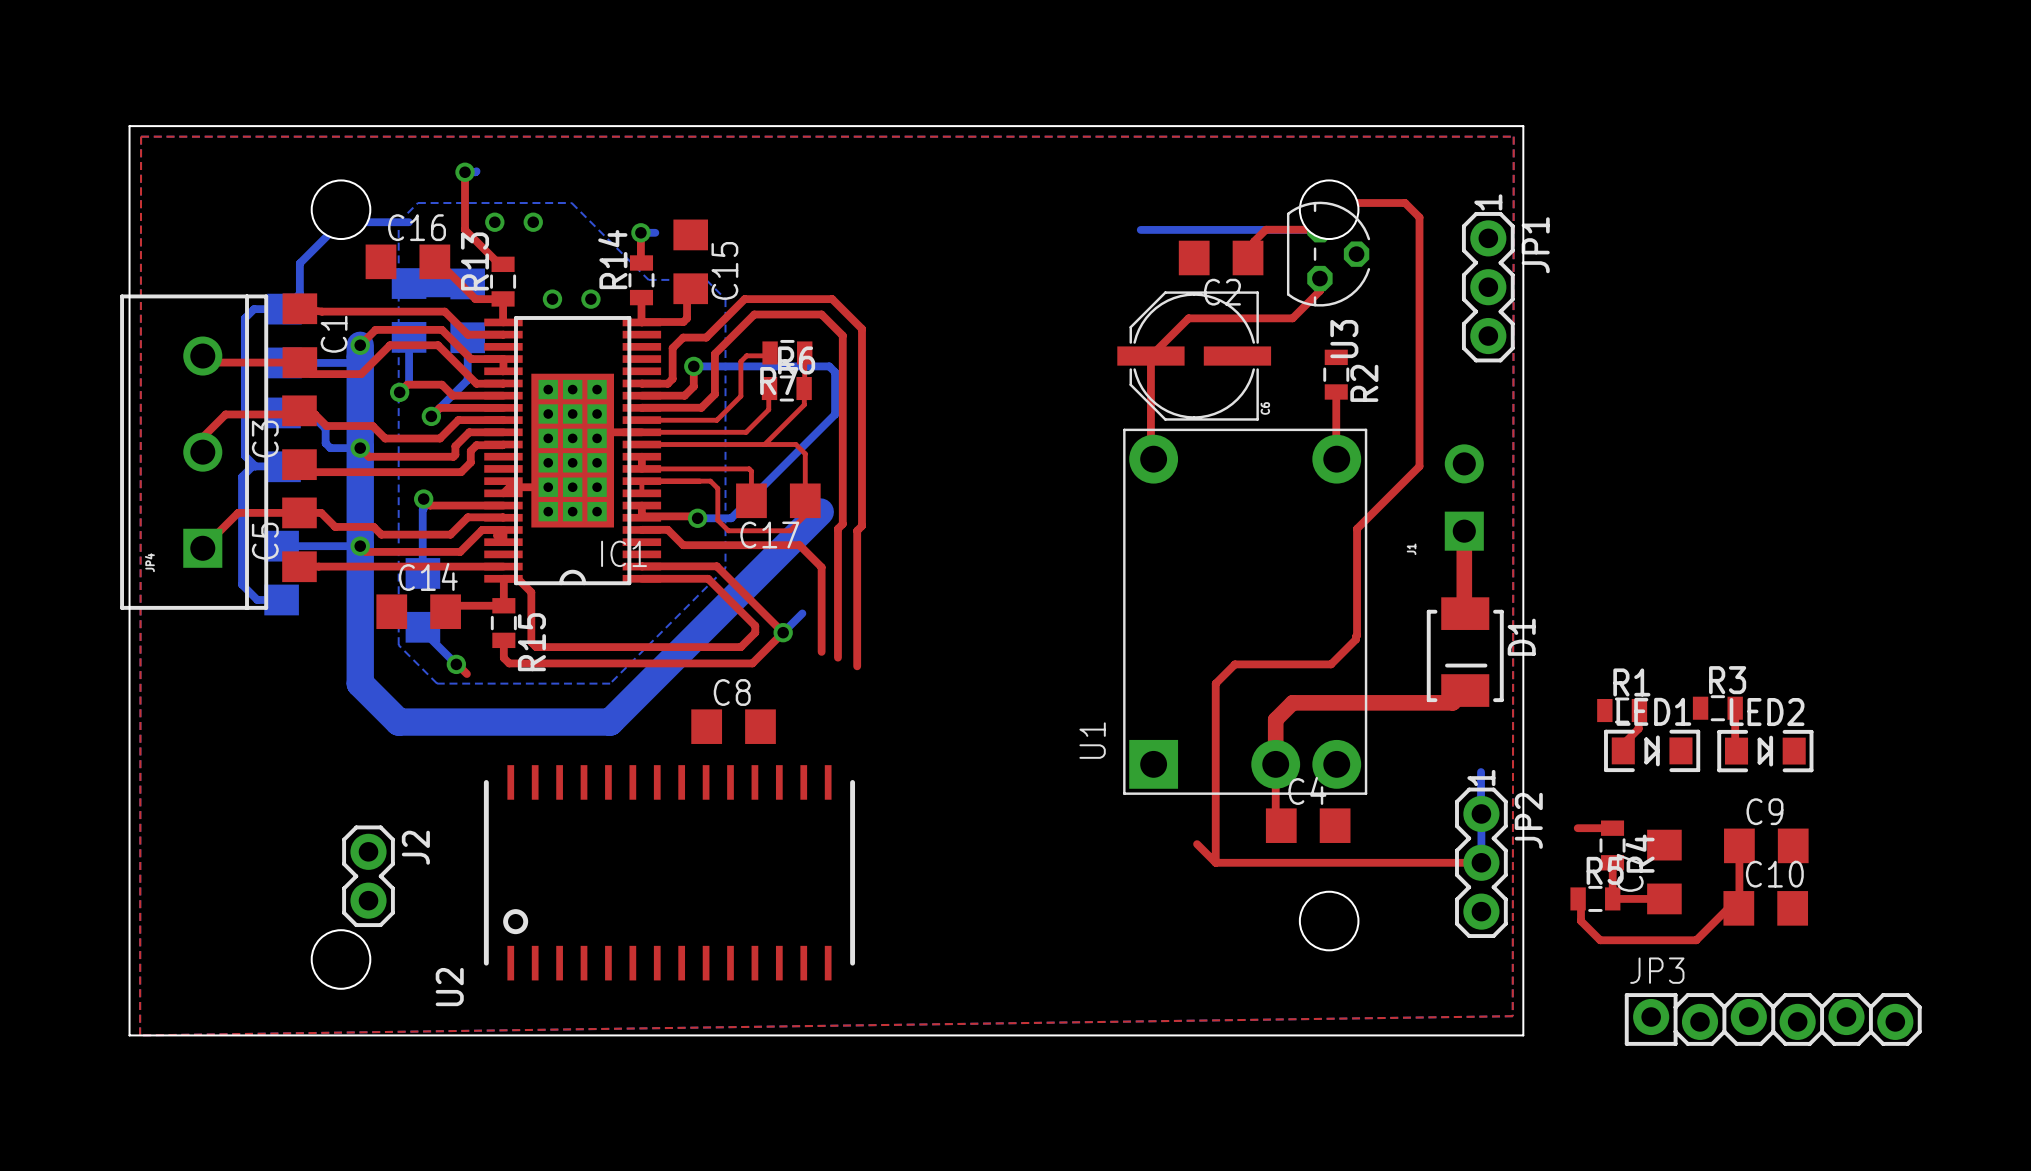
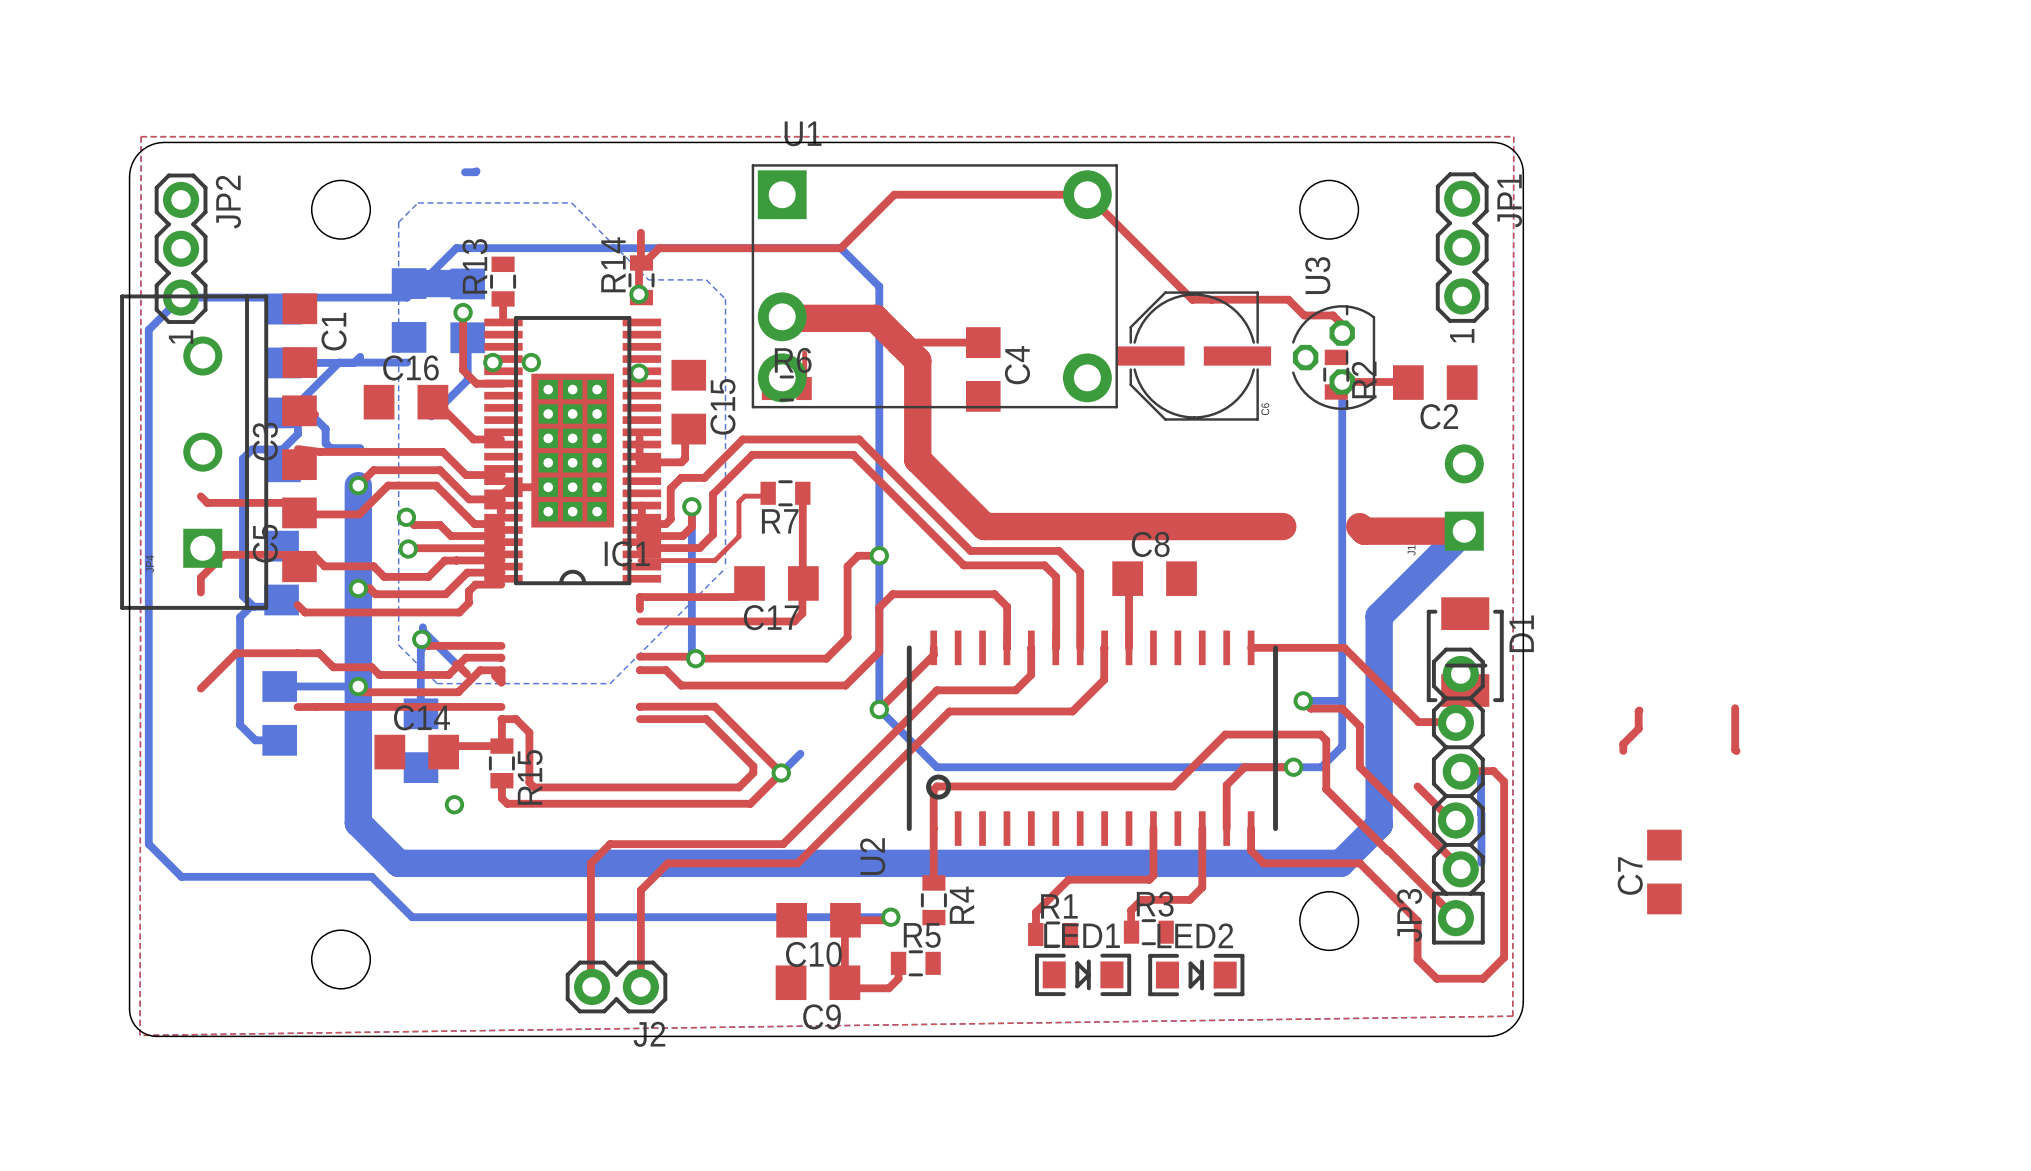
top track: (465, 172) (465, 229) (498, 262) (504, 262) (503, 264) -> none
via: (465, 172) -> none
board edge: (1523, 172) (1523, 126) (129, 126) (129, 177) -> (1523, 172) (1521, 161) (1514, 151) (1504, 144) (1492, 142) (164, 142) (150, 145) (139, 152) (132, 163) (129, 177)
JP1 text position: 1 (1488, 202) -> 1 (1462, 335)
bottom track: (409, 222) (341, 222) (299, 263) (299, 293) (284, 309) (254, 309) (244, 318) (244, 455) (255, 466) -> (407, 362) (339, 362) (297, 403) (297, 434) (282, 449) (252, 449) (242, 458) (242, 596) (253, 606)
via: (494, 222) -> none
via: (533, 222) -> none
bottom track: (1140, 229) (1319, 229) -> none
bottom track: (640, 232) (655, 232) -> none
via: (640, 232) -> none
U3 rotation: 0° (1328, 254) -> 180° (1333, 357)
U3 position: (1328, 254) -> (1333, 357)
C2 position: (1221, 257) -> (1435, 382)
top track: (1248, 257) (1254, 251) (1254, 241) (1265, 229) (1319, 229) (1319, 208) (1325, 203) (1405, 203) (1419, 217) (1419, 466) (1357, 528) (1356, 639) (1331, 664) (1234, 664) (1215, 683) (1215, 862) -> none
C16 position: (407, 261) -> (405, 402)
top track: (434, 261) (438, 261) (475, 299) (502, 299) -> (432, 402) (436, 402) (473, 439) (500, 439)
C15 position: (690, 261) -> (688, 402)
top track: (1319, 278) (1319, 291) (1292, 318) (1188, 318) (1150, 356) (1150, 456) (1153, 459) -> none
JP1 position: (1488, 287) -> (1462, 247)
top track: (690, 288) (687, 292) (687, 318) (683, 322) (641, 322) (641, 297) -> (688, 429) (685, 432) (685, 458) (681, 462) (639, 462) (639, 437)
top track: none -> (638, 294) (638, 268) (659, 248) (840, 248) (894, 194) (1087, 194) (1192, 299) (1288, 299) (1304, 315) (1333, 315) (1342, 325) (1342, 332)
via: none -> (638, 294)
via: (552, 299) -> none
via: (590, 299) -> none
top track: (299, 308) (321, 311) (444, 311) (467, 334) (503, 334) -> (297, 449) (320, 451) (442, 451) (465, 475) (501, 475)
via: none -> (463, 312)
top track: none -> (782, 316) (783, 318) (875, 318) (917, 360) (917, 459) (984, 526) (1282, 526)
bottom track: (409, 337) (409, 382) (399, 392) -> none
top track: none -> (983, 342) (899, 342)
top track: (360, 345) (375, 329) (441, 329) (471, 359) (503, 359) (502, 371) -> (358, 485) (373, 470) (440, 470) (469, 499) (501, 499) (500, 511)
bottom track: (360, 345) (360, 683) (398, 722) (610, 722) (820, 511) -> none
via: (360, 345) -> none
top track: (770, 352) (767, 355) (746, 355) (740, 361) (740, 396) (716, 420) (642, 420) -> (768, 493) (765, 496) (744, 496) (738, 501) (738, 536) (714, 560) (640, 560)
R7 position: (787, 352) -> (785, 493)
top track: (202, 356) (209, 362) (299, 362) (311, 374) (361, 374) (390, 345) (438, 345) (463, 370) -> (463, 312) (463, 370)
via: none -> (492, 362)
via: none -> (531, 362)
top track: (693, 366) (693, 386) (684, 395) (641, 395) -> (691, 506) (691, 526) (682, 536) (639, 536)
bottom track: (693, 366) (829, 366) (835, 372) (835, 414) (731, 518) (697, 518) -> none
via: (693, 366) -> none
via: none -> (638, 373)
top track: none -> (1342, 381) (1408, 382)
bottom track: none -> (1342, 381) (1342, 746) (1321, 767) (936, 767) (879, 709) (879, 286) (840, 248) (456, 248) (406, 297) (181, 297) (148, 329) (148, 844) (181, 876) (371, 876) (412, 917) (890, 917)
top track: (642, 383) (667, 383) (672, 378) (672, 348) (683, 337) (706, 337) (744, 299) (832, 299) (862, 328) (862, 525) (857, 530) (857, 666) -> none
top track: (769, 388) (768, 409) (746, 432) (590, 433) (597, 438) -> none
top track: (804, 388) (804, 404) (764, 444) -> none
top track: (1336, 391) (1336, 459) -> none
top track: (399, 392) (407, 384) (441, 384) (452, 395) (503, 395) -> none
via: (399, 392) -> none
top track: (503, 407) (439, 407) (431, 416) -> none
top track: (642, 407) (701, 407) (714, 394) (714, 353) (754, 314) (821, 314) (842, 335) (842, 524) (837, 528) (837, 657) -> none
via: (431, 416) -> none
top track: (503, 420) (458, 420) (440, 438) (385, 438) (372, 426) (326, 426) (315, 414) (225, 414) (202, 437) (202, 452) -> none
top track: (503, 432) (469, 432) (455, 446) (455, 454) (453, 456) (368, 456) (360, 448) -> none
top track: (503, 444) (476, 445) (470, 451) (470, 462) (461, 472) (306, 472) (299, 464) -> none
top track: (641, 444) (795, 444) (805, 453) (805, 515) (789, 530) (728, 530) (717, 520) (717, 488) (710, 481) (641, 481) (641, 493) -> none
via: (360, 448) -> none
top track: (641, 456) (641, 468) (749, 468) (751, 471) (751, 500) -> none
bottom track: (283, 466) (252, 466) (242, 476) (242, 584) (257, 599) (281, 599) -> (281, 607) (250, 606) (240, 617) (240, 724) (255, 740) (279, 740)
bottom track: none -> (358, 485) (358, 822) (398, 863) (1340, 863) (1379, 824) (1379, 616) (1464, 531)
via: none -> (358, 485)
top track: none -> (802, 493) (802, 613) (794, 621) (639, 621) (697, 621)
top track: none -> (200, 496) (207, 502) (297, 502) (309, 514) (359, 514) (388, 485) (436, 485) (474, 524) (501, 524)
top track: (423, 499) (430, 505) (503, 505) -> (421, 639) (428, 645) (501, 645)
bottom track: (423, 499) (422, 573) -> (421, 639) (420, 713)
via position: (423, 499) -> (406, 517)
C17 position: (778, 500) -> (776, 583)
bottom track: none -> (691, 506) (691, 654) (695, 658)
top track: none -> (406, 517) (414, 525) (440, 525) (451, 536) (501, 536)
top track: (503, 517) (467, 517) (450, 534) (381, 534) (373, 526) (335, 526) (321, 512) (238, 512) (202, 548) -> (501, 658) (465, 657) (448, 674) (379, 674) (371, 667) (333, 667) (319, 653) (236, 653) (200, 688)
top track: (641, 517) (695, 516) (697, 518) -> none
via position: (697, 518) -> (691, 506)
top track: none -> (640, 524) (665, 524) (670, 519) (670, 488) (681, 477) (704, 477) (742, 439) (859, 439) (970, 550) (1059, 550) (1080, 572) (1080, 647)
top track: (642, 529) (667, 529) (683, 545) (799, 545) (821, 567) (821, 651) -> none
top track: (1464, 531) (1465, 613) -> (1464, 531) (1364, 531) (1359, 526)
top track: (496, 535) (503, 542) (503, 529) (482, 529) (460, 551) (366, 551) (360, 546) -> (494, 675) (501, 682) (501, 670) (480, 670) (458, 692) (364, 692) (358, 686)
bottom track: (281, 546) (360, 546) -> (279, 686) (358, 686)
via: (360, 546) -> none
top track: none -> (501, 548) (408, 549)
top track: none -> (640, 548) (699, 548) (713, 534) (713, 494) (752, 454) (853, 454) (963, 565) (1044, 565) (1056, 576) (1055, 647)
via: none -> (408, 549)
top track: none -> (879, 555) (858, 555) (847, 566) (847, 637) (826, 658) (695, 658) (693, 656) (639, 658)
via: none -> (879, 555)
top track: none -> (456, 560) (501, 560)
top track: none -> (456, 560) (444, 560) (428, 576) (384, 576) (373, 566) (324, 566) (313, 554) (223, 554) (200, 577) (200, 592)
top track: (503, 566) (299, 566) -> (501, 706) (297, 707)
top track: (642, 566) (716, 566) (783, 632) (752, 663) (509, 663) (503, 658) (503, 640) -> (640, 706) (714, 706) (781, 773) (750, 803) (507, 803) (501, 798) (501, 780)
top track: none -> (501, 572) (467, 572) (445, 594) (375, 594) (369, 588) (358, 588)
top track: (641, 578) (708, 578) (755, 625) (755, 632) (740, 647) (536, 647) (531, 642) (531, 592) (517, 578) (503, 578) (503, 605) -> (639, 719) (706, 719) (753, 766) (753, 773) (738, 787) (534, 787) (529, 782) (529, 732) (515, 719) (501, 719) (501, 746)
top track: none -> (1127, 578) (1129, 647)
top track: none -> (749, 583) (735, 597) (639, 597) (639, 609)
top track: none -> (501, 584) (475, 584) (468, 591) (468, 602) (459, 612) (305, 612) (297, 604)
via: none -> (358, 588)
part: (422, 600) -> none
top track: (503, 605) (451, 605) (445, 611) -> (501, 746) (449, 746) (443, 752)
C14 position: (418, 611) -> (416, 752)
U1 rotation: 0° (1245, 611) -> 90° clockwise (934, 286)
U1 position: (1245, 611) -> (934, 286)
bottom track: (802, 613) (783, 632) -> (800, 753) (781, 773)
R15 position: (503, 623) -> (501, 763)
via: (783, 632) -> none
top track: none -> (933, 647) (933, 655) (879, 709)
top track: none -> (1007, 647) (1007, 606) (994, 594) (892, 594) (879, 607) (879, 651) (845, 685) (681, 685) (665, 670) (640, 670)
top track: none -> (1104, 647) (1104, 679) (1072, 711) (949, 711) (797, 863) (667, 863) (640, 890) (640, 986)
top track: none -> (1251, 647) (1344, 647) (1418, 722) (1455, 722)
top track: none -> (1031, 648) (1031, 674) (1015, 690) (936, 690) (783, 844) (610, 844) (590, 863) (592, 986)
via: none -> (695, 658)
via position: (456, 664) -> (421, 639)
via: none -> (358, 686)
top track: (1465, 690) (1452, 702) (1292, 702) (1275, 719) (1275, 820) (1281, 825) -> none
top track: none -> (1303, 700) (1310, 708) (1342, 708) (1359, 726) (1359, 767) (1460, 869)
bottom track: none -> (1303, 700) (1342, 700)
via: none -> (1303, 700)
R3 position: (1717, 708) -> (1148, 932)
via: none -> (879, 709)
R1 position: (1622, 710) -> (1053, 934)
part: none -> (279, 713)
C8 position: (733, 726) -> (1154, 578)
part: none -> (420, 740)
LED1 position: (1652, 750) -> (1083, 974)
LED2 position: (1765, 751) -> (1196, 975)
top track: none -> (1293, 767) (1244, 767) (1226, 785) (1226, 828)
via: none -> (1293, 767)
top track: none -> (1460, 771) (1493, 771) (1504, 781) (1504, 957) (1482, 978) (1436, 978) (1417, 959) (1417, 921) (1359, 863) (1263, 863) (1251, 850) (1251, 828)
via: none -> (781, 773)
JP2 text position: 1 (1481, 778) -> 1 (181, 337)
top track: none -> (1417, 786) (1451, 820) (1455, 820)
via: none -> (454, 804)
C9 name position: C9 (1764, 811) -> C9 (822, 1016)
C4 rotation: 0° (1308, 825) -> 90° clockwise (983, 369)
C4 position: (1308, 825) -> (983, 369)
top track: none -> (1153, 828) (1153, 875) (1149, 879) (1068, 879) (1035, 912) (1035, 934)
top track: none -> (1202, 828) (1202, 887) (1189, 899) (1141, 899) (1131, 910) (1131, 932)
top track: (1577, 828) (1612, 828) -> none
top track: (1197, 844) (1215, 862) -> none
R4 position: (1612, 845) -> (933, 900)
top track: (1739, 845) (1739, 907) (1728, 908) (1696, 940) (1600, 940) (1580, 921) (1580, 901) (1578, 898) -> none
C9 position: (1766, 845) -> (817, 982)
top track: (1215, 862) (1481, 862) -> none
JP2 position: (1481, 862) -> (181, 248)
top track: (1612, 862) (1612, 898) (1664, 898) -> none
U2 position: (669, 872) -> (1092, 738)
C10 name position: C10 (1774, 874) -> C10 (813, 954)
J2 rotation: 0° (368, 876) -> 90° clockwise (616, 986)
J2 position: (368, 876) -> (616, 986)
top track: none -> (933, 882) (933, 789) (936, 786) (1173, 786) (1225, 734) (1320, 734) (1326, 740) (1326, 789) (1455, 918)
R5 position: (1595, 898) -> (915, 963)
C10 position: (1765, 908) -> (818, 920)
top track: none -> (890, 917) (887, 920) (844, 920) (844, 982) (850, 988) (888, 988) (898, 978) (898, 963)
via: none -> (890, 917)
board edge: (1523, 1001) (1523, 1035) (129, 1035) (129, 1009) -> (1523, 1001) (1520, 1014) (1513, 1026) (1501, 1033) (1488, 1036) (156, 1036) (146, 1034) (137, 1028) (131, 1019) (129, 1009)
JP3 rotation: 0° (1773, 1019) -> 90° counterclockwise (1458, 796)
JP3 position: (1773, 1019) -> (1458, 796)

